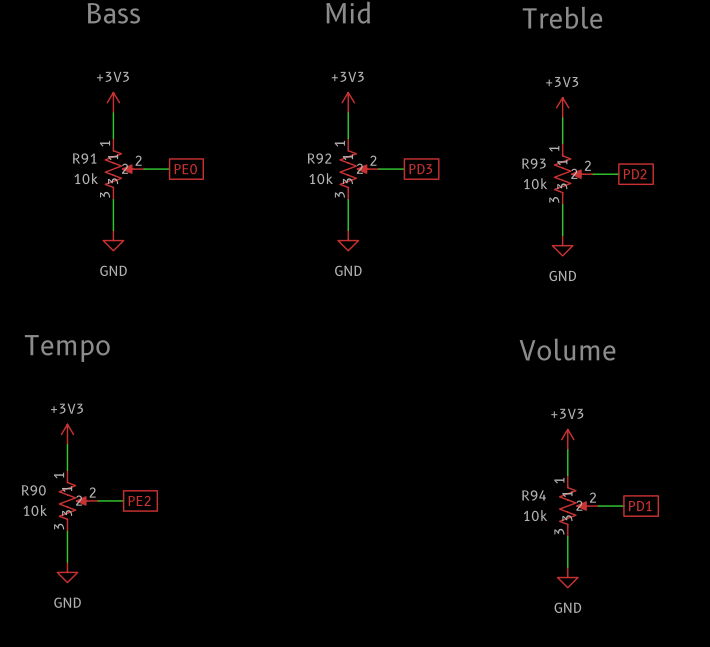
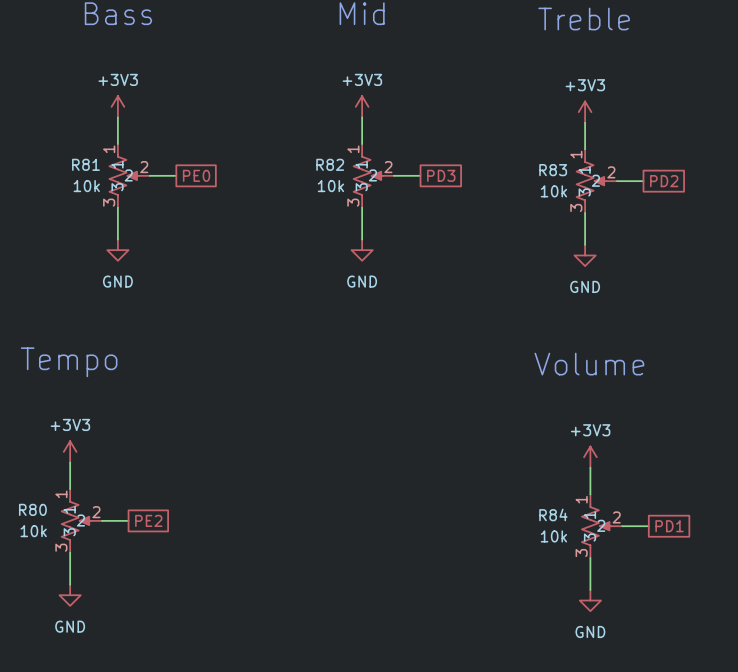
R91 name: R91 (84, 158) -> R81 (85, 164)
R92 name: R92 (319, 158) -> R82 (330, 164)
R93 name: R93 (533, 163) -> R83 (553, 170)
R90 name: R90 (33, 490) -> R80 (32, 509)
R94 name: R94 (534, 495) -> R84 (553, 514)

